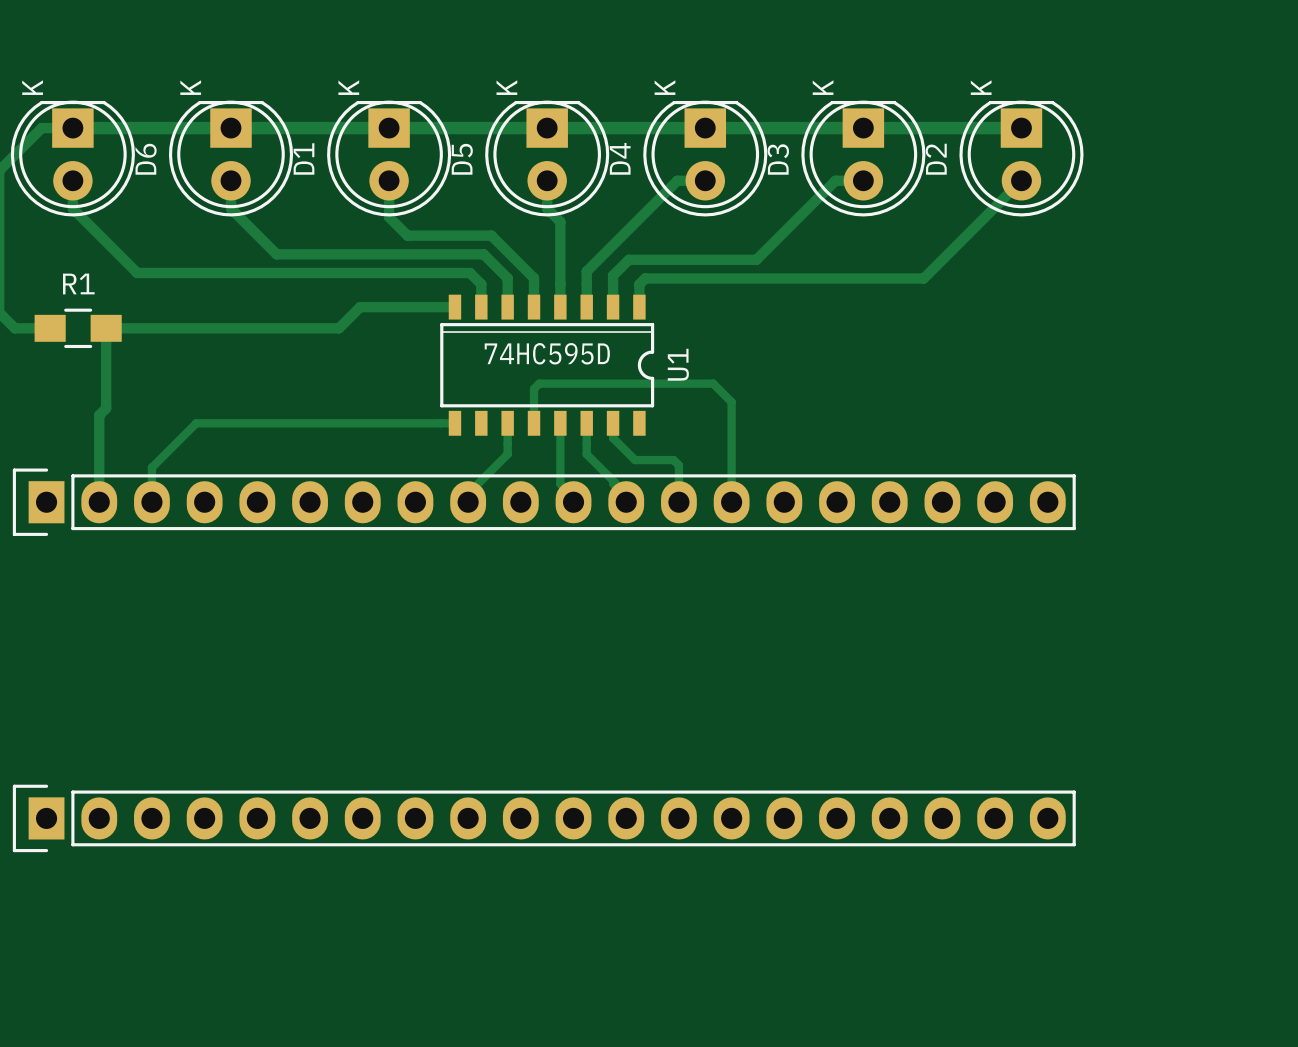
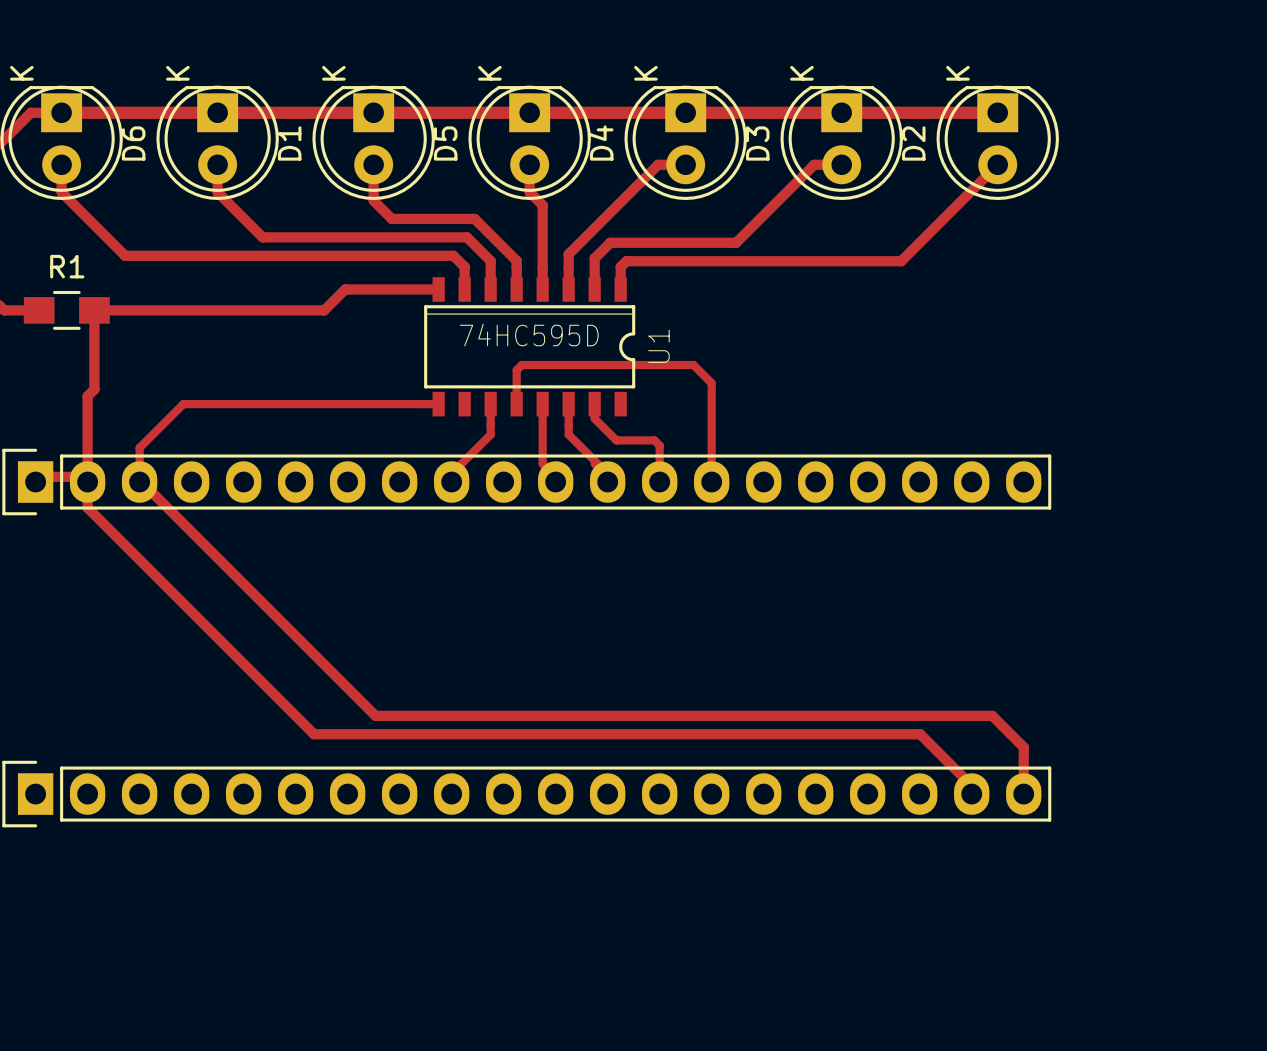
track: none -> (35, 476) (87, 476) (87, 507) (314, 734) (920, 734) (971, 785)
track: none -> (139, 479) (375, 715) (992, 715) (1023, 747) (1023, 788)

